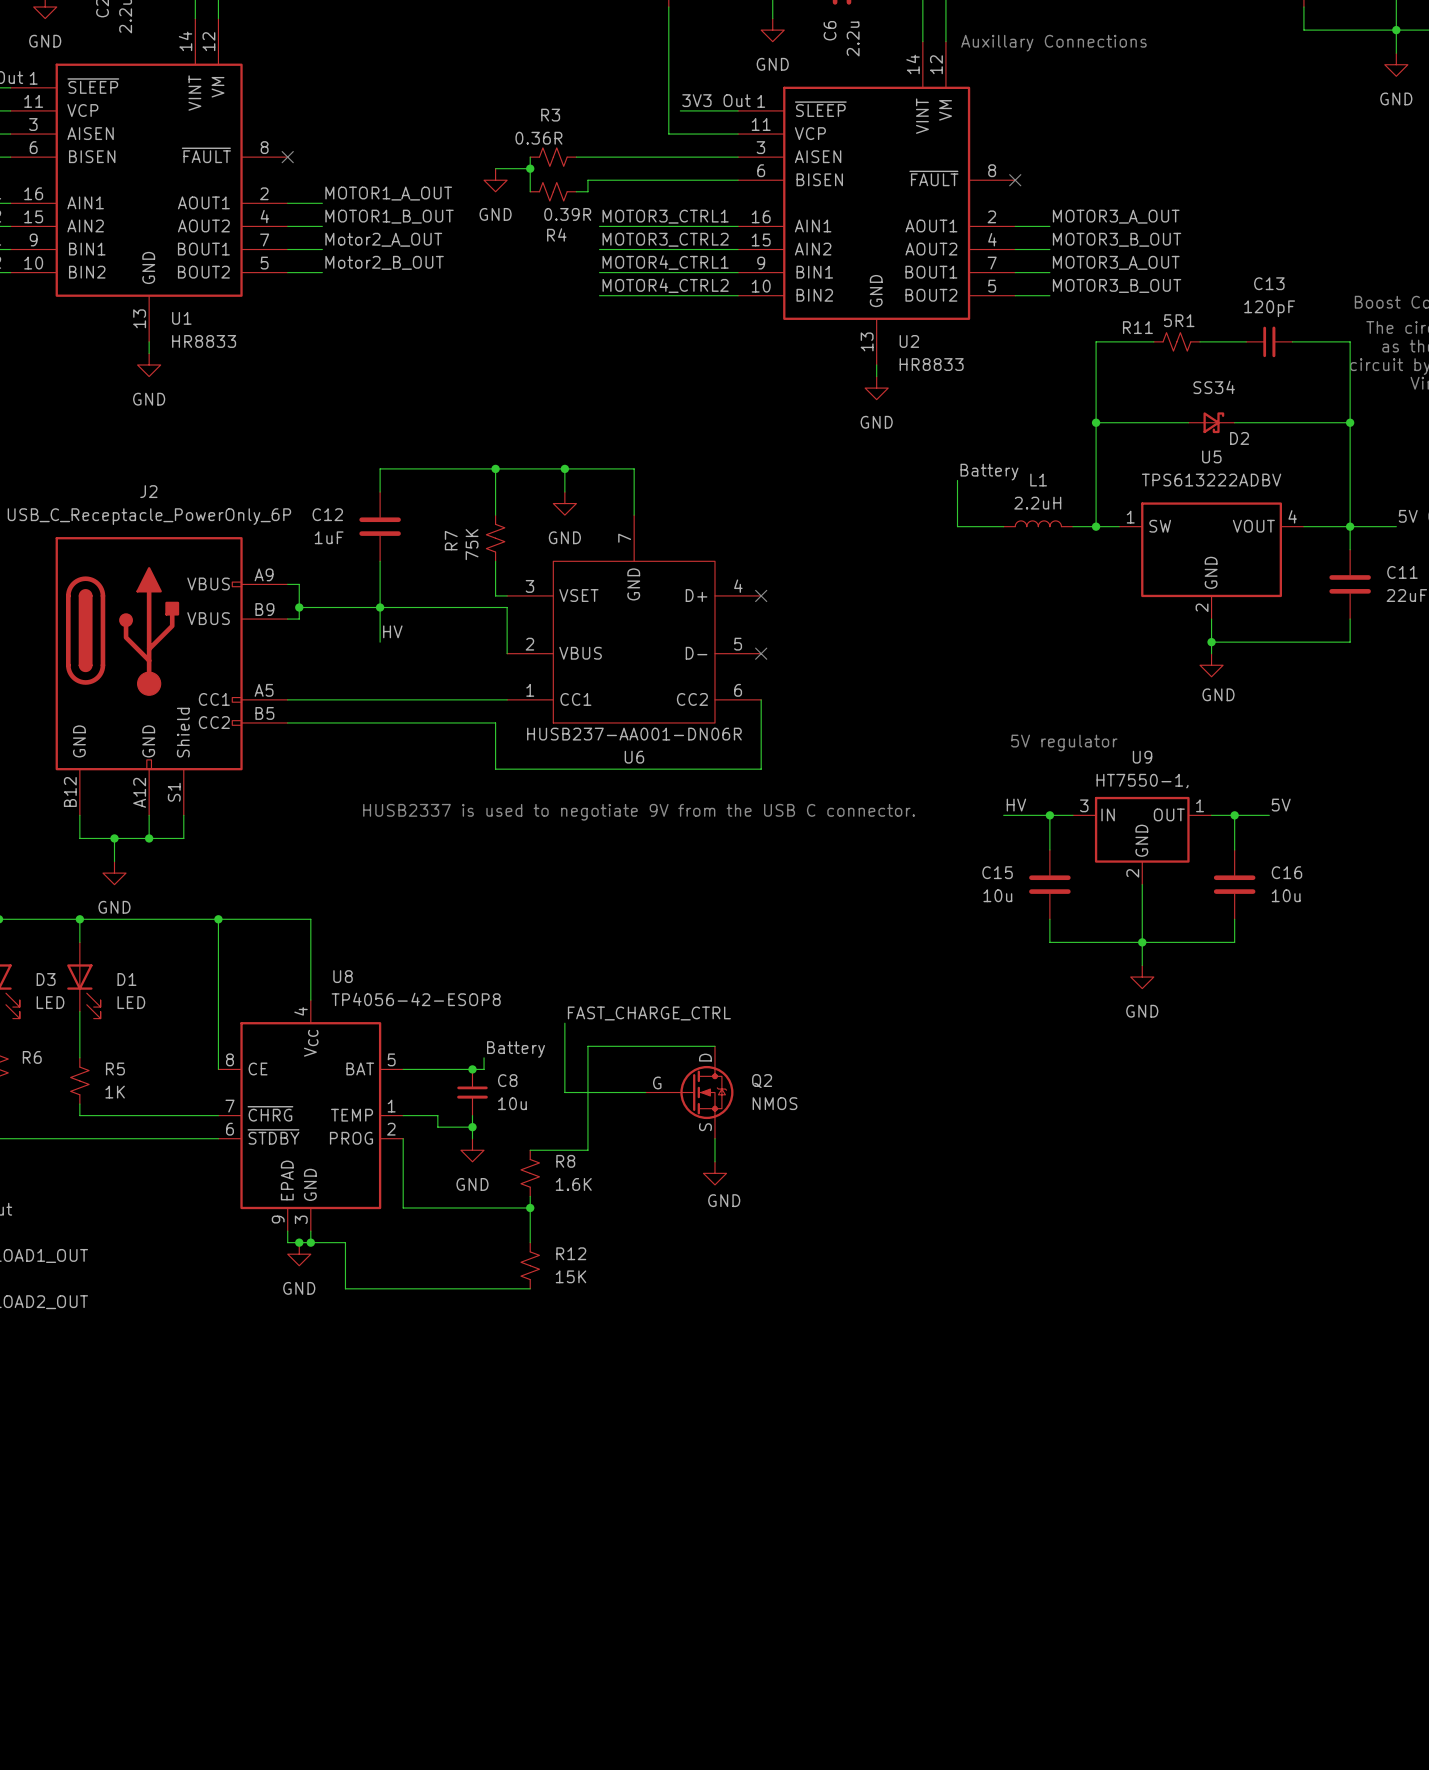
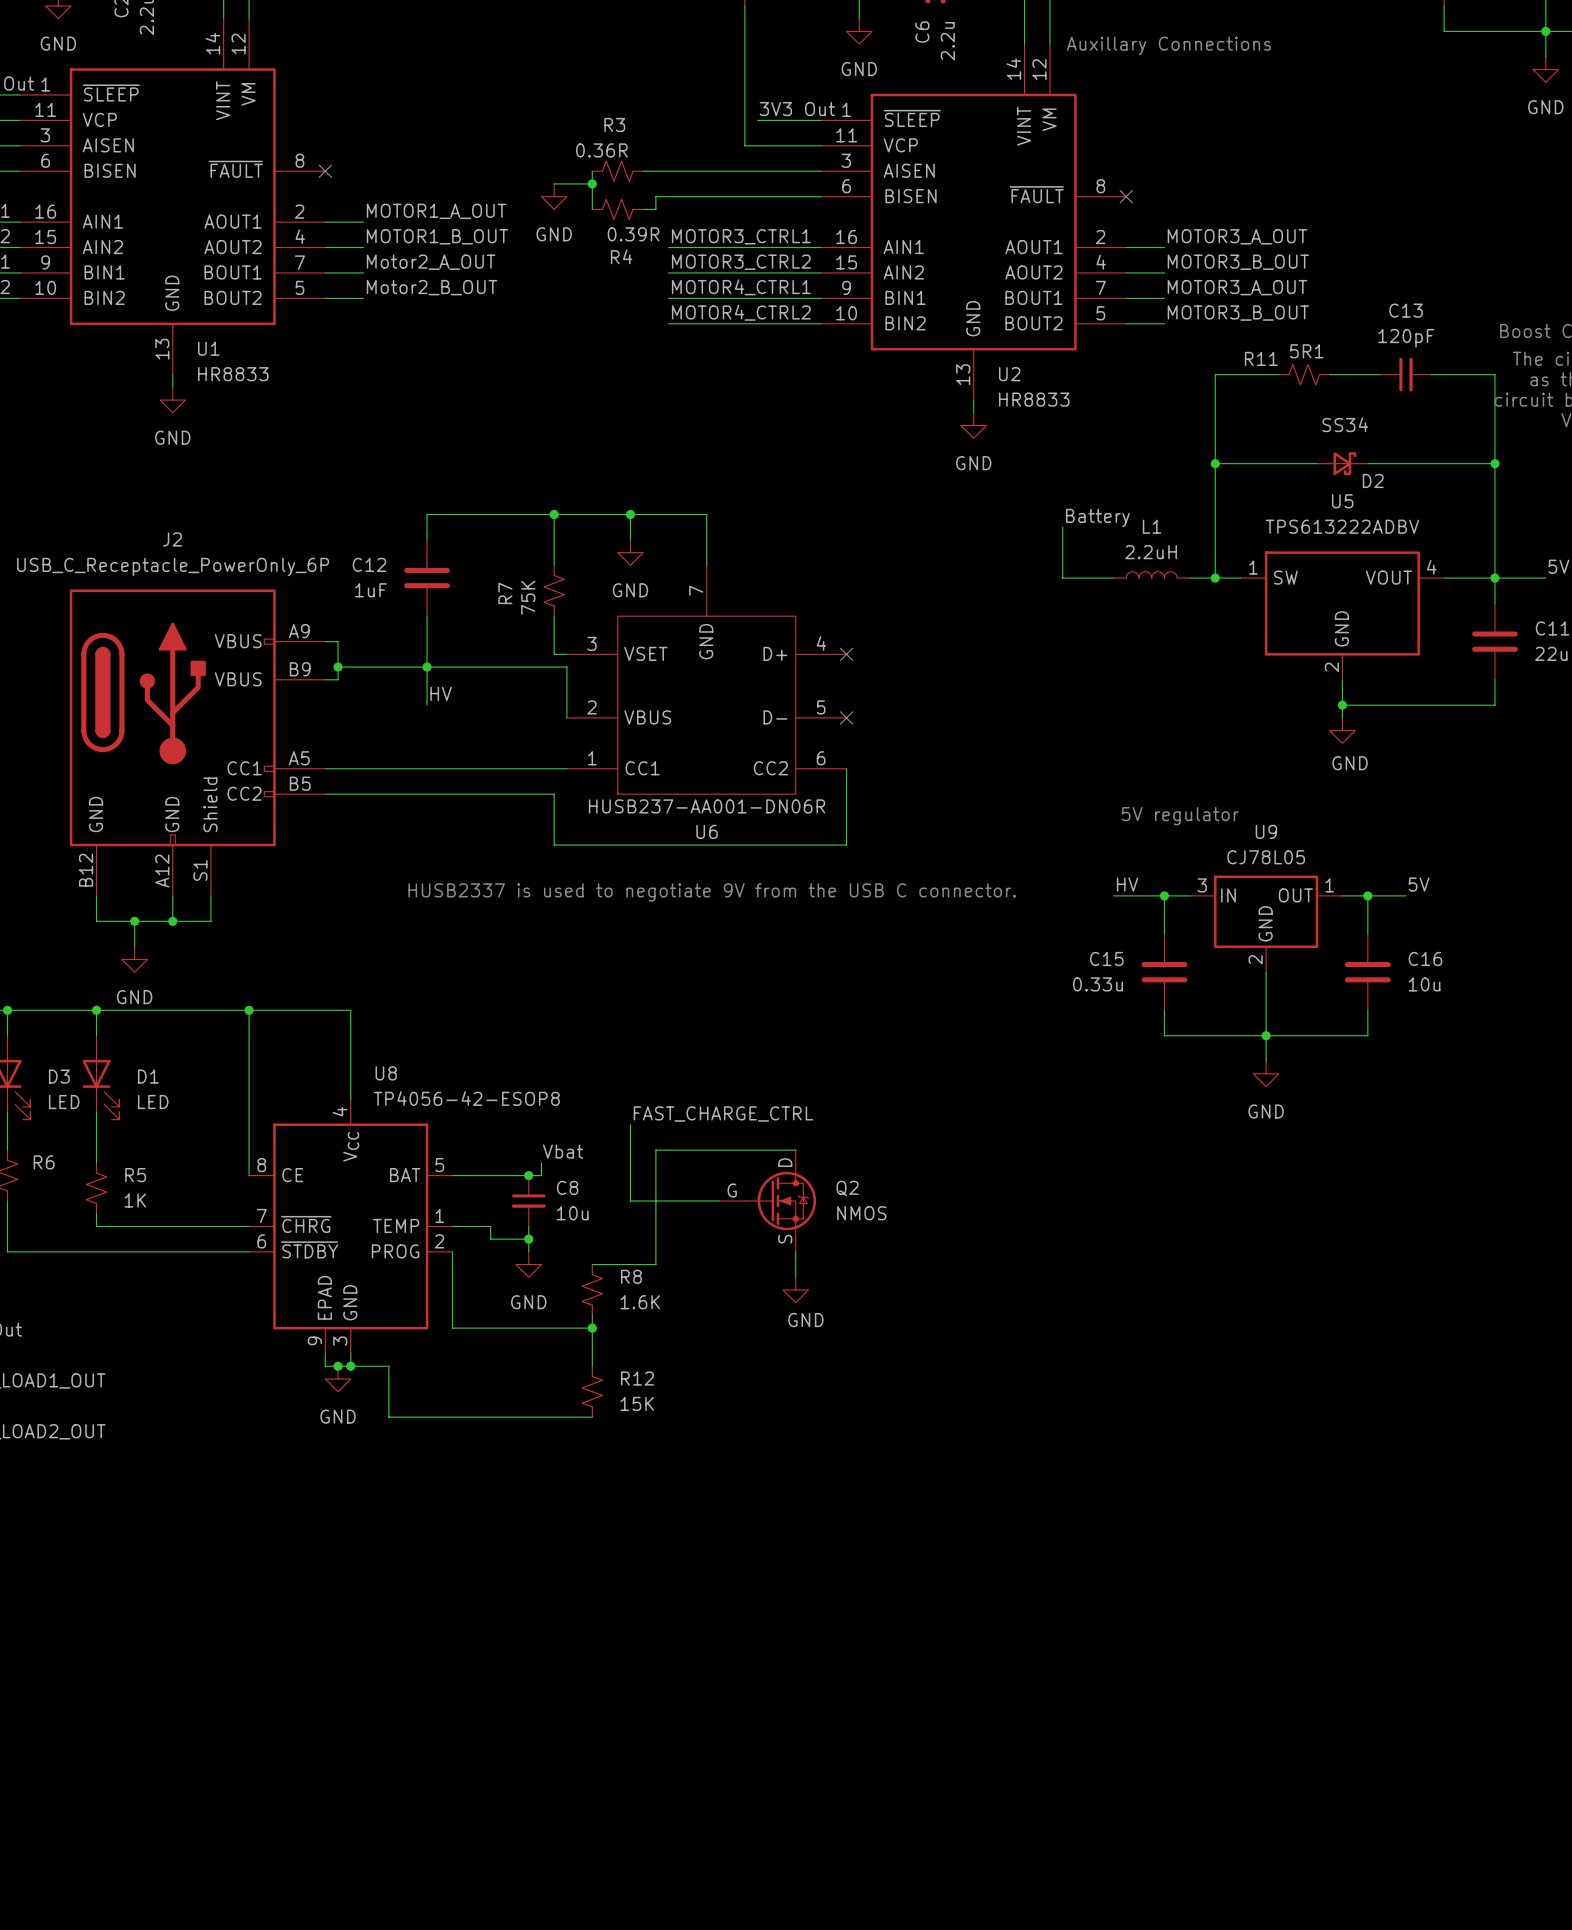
U9 value: HT7550-1, (1142, 781) -> CJ78L05 (1266, 857)
C15 value: 10u (997, 895) -> 0.33u (1098, 984)
label: Battery (516, 1049) -> Vbat (563, 1151)

